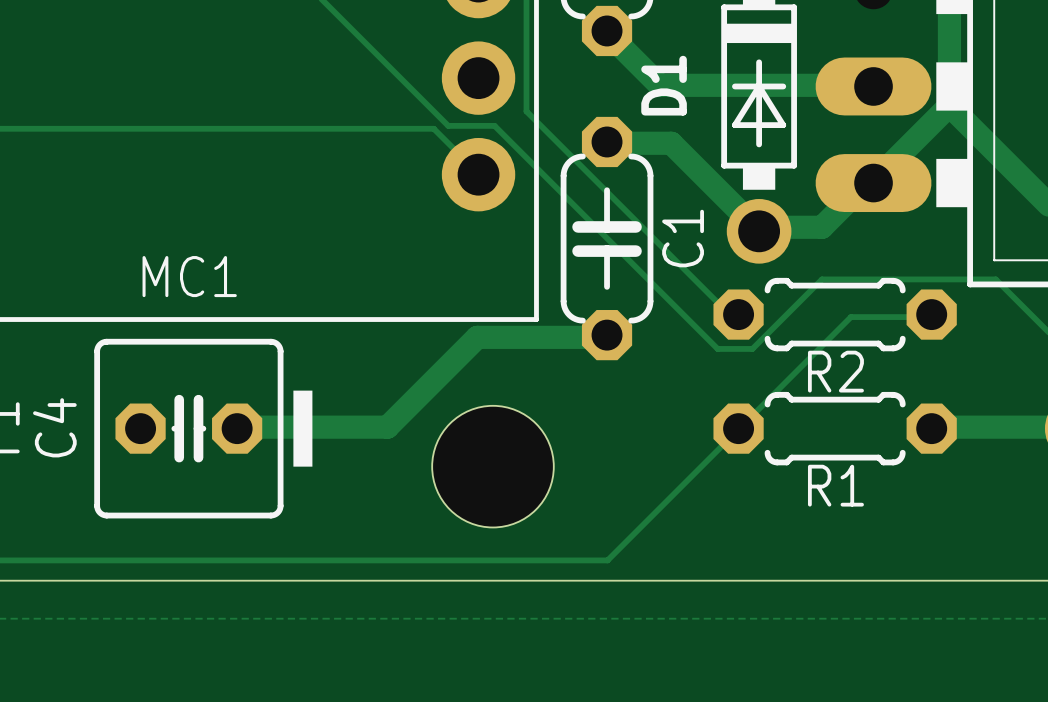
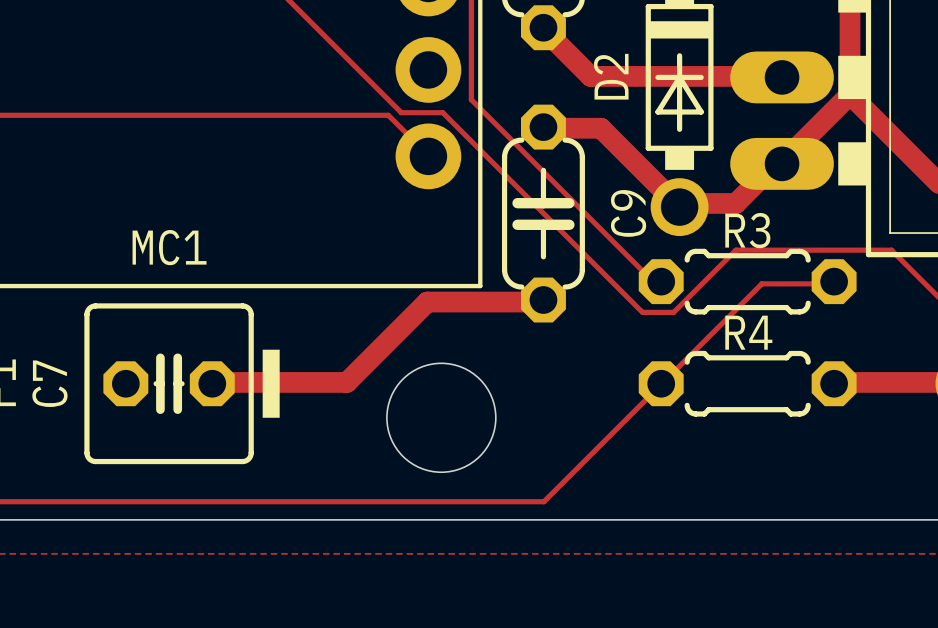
D1 name: D1 (664, 85) -> D2 (611, 76)
C1 name: C1 (683, 238) -> C9 (628, 213)
R2 name: R2 (835, 371) -> R3 (747, 230)
C4 name: C4 (54, 427) -> C7 (49, 383)
R1 name: R1 (835, 485) -> R4 (748, 332)

